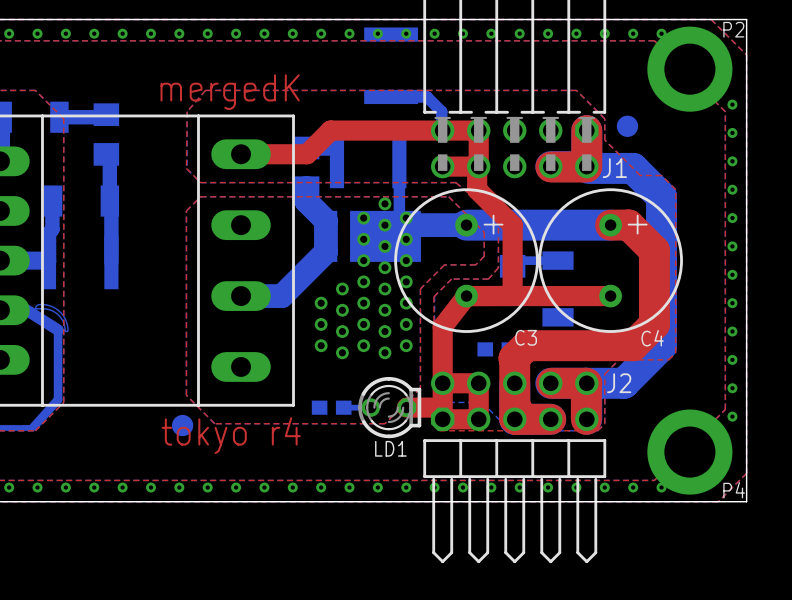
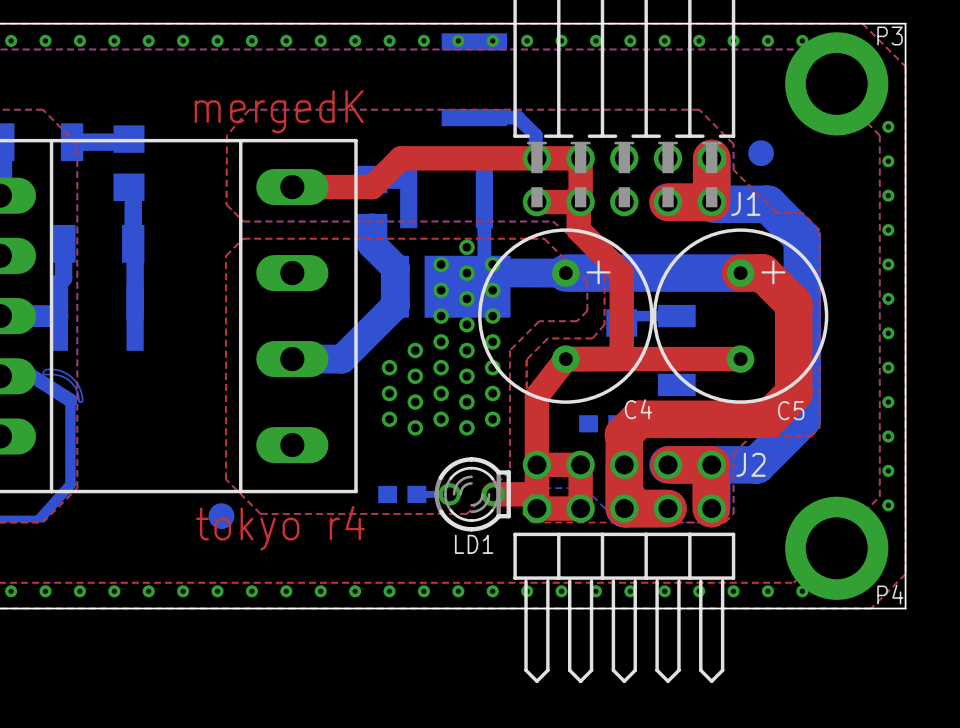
P2 name: P2 (733, 29) -> P3 (890, 36)
C3 name: C3 (526, 337) -> C4 (638, 409)
C4 name: C4 (652, 338) -> C5 (791, 410)

